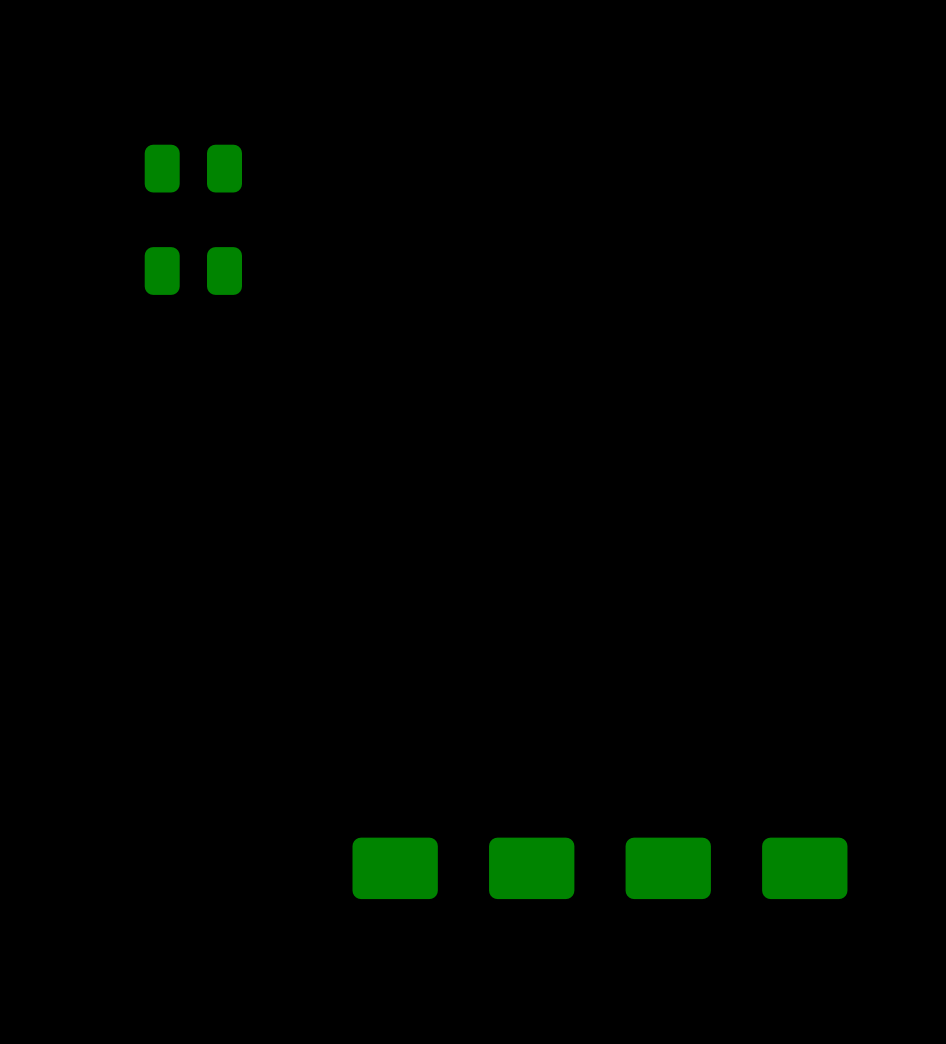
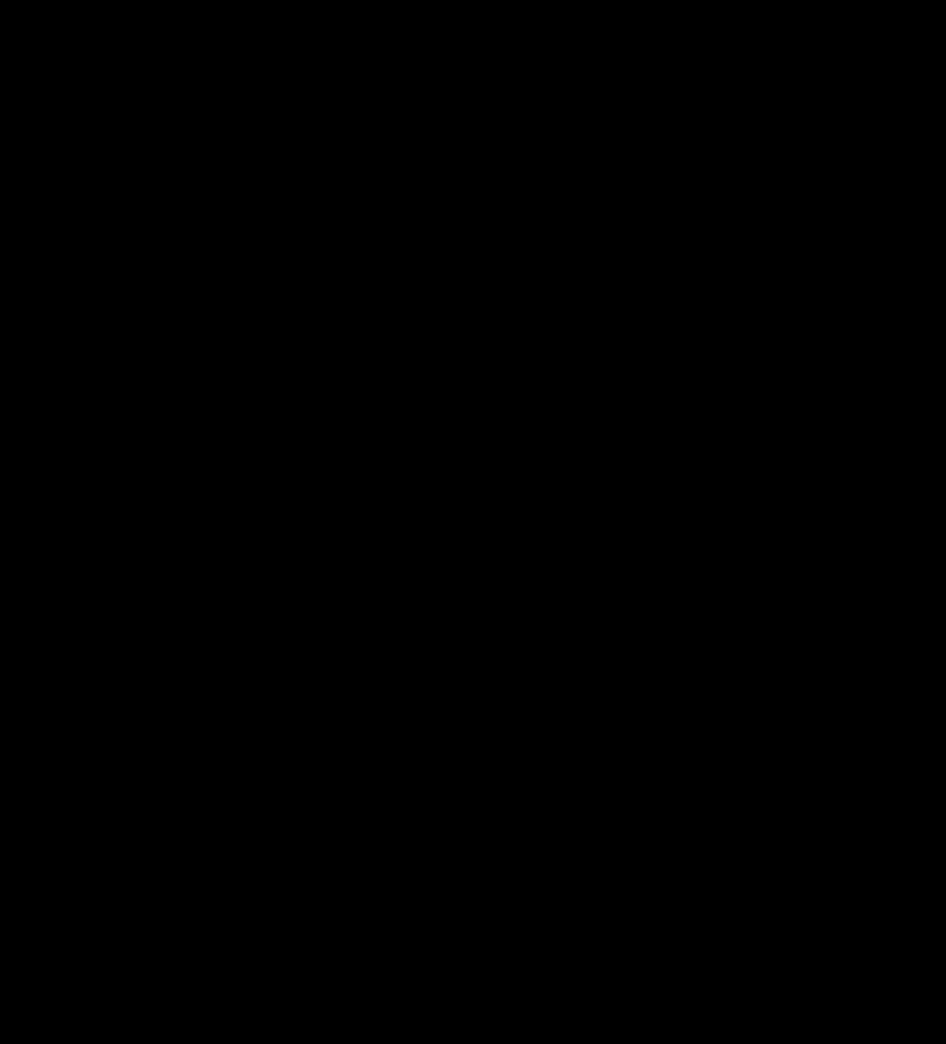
part: (193, 168) -> none
part: (193, 271) -> none
part: (463, 868) -> none
part: (736, 868) -> none

